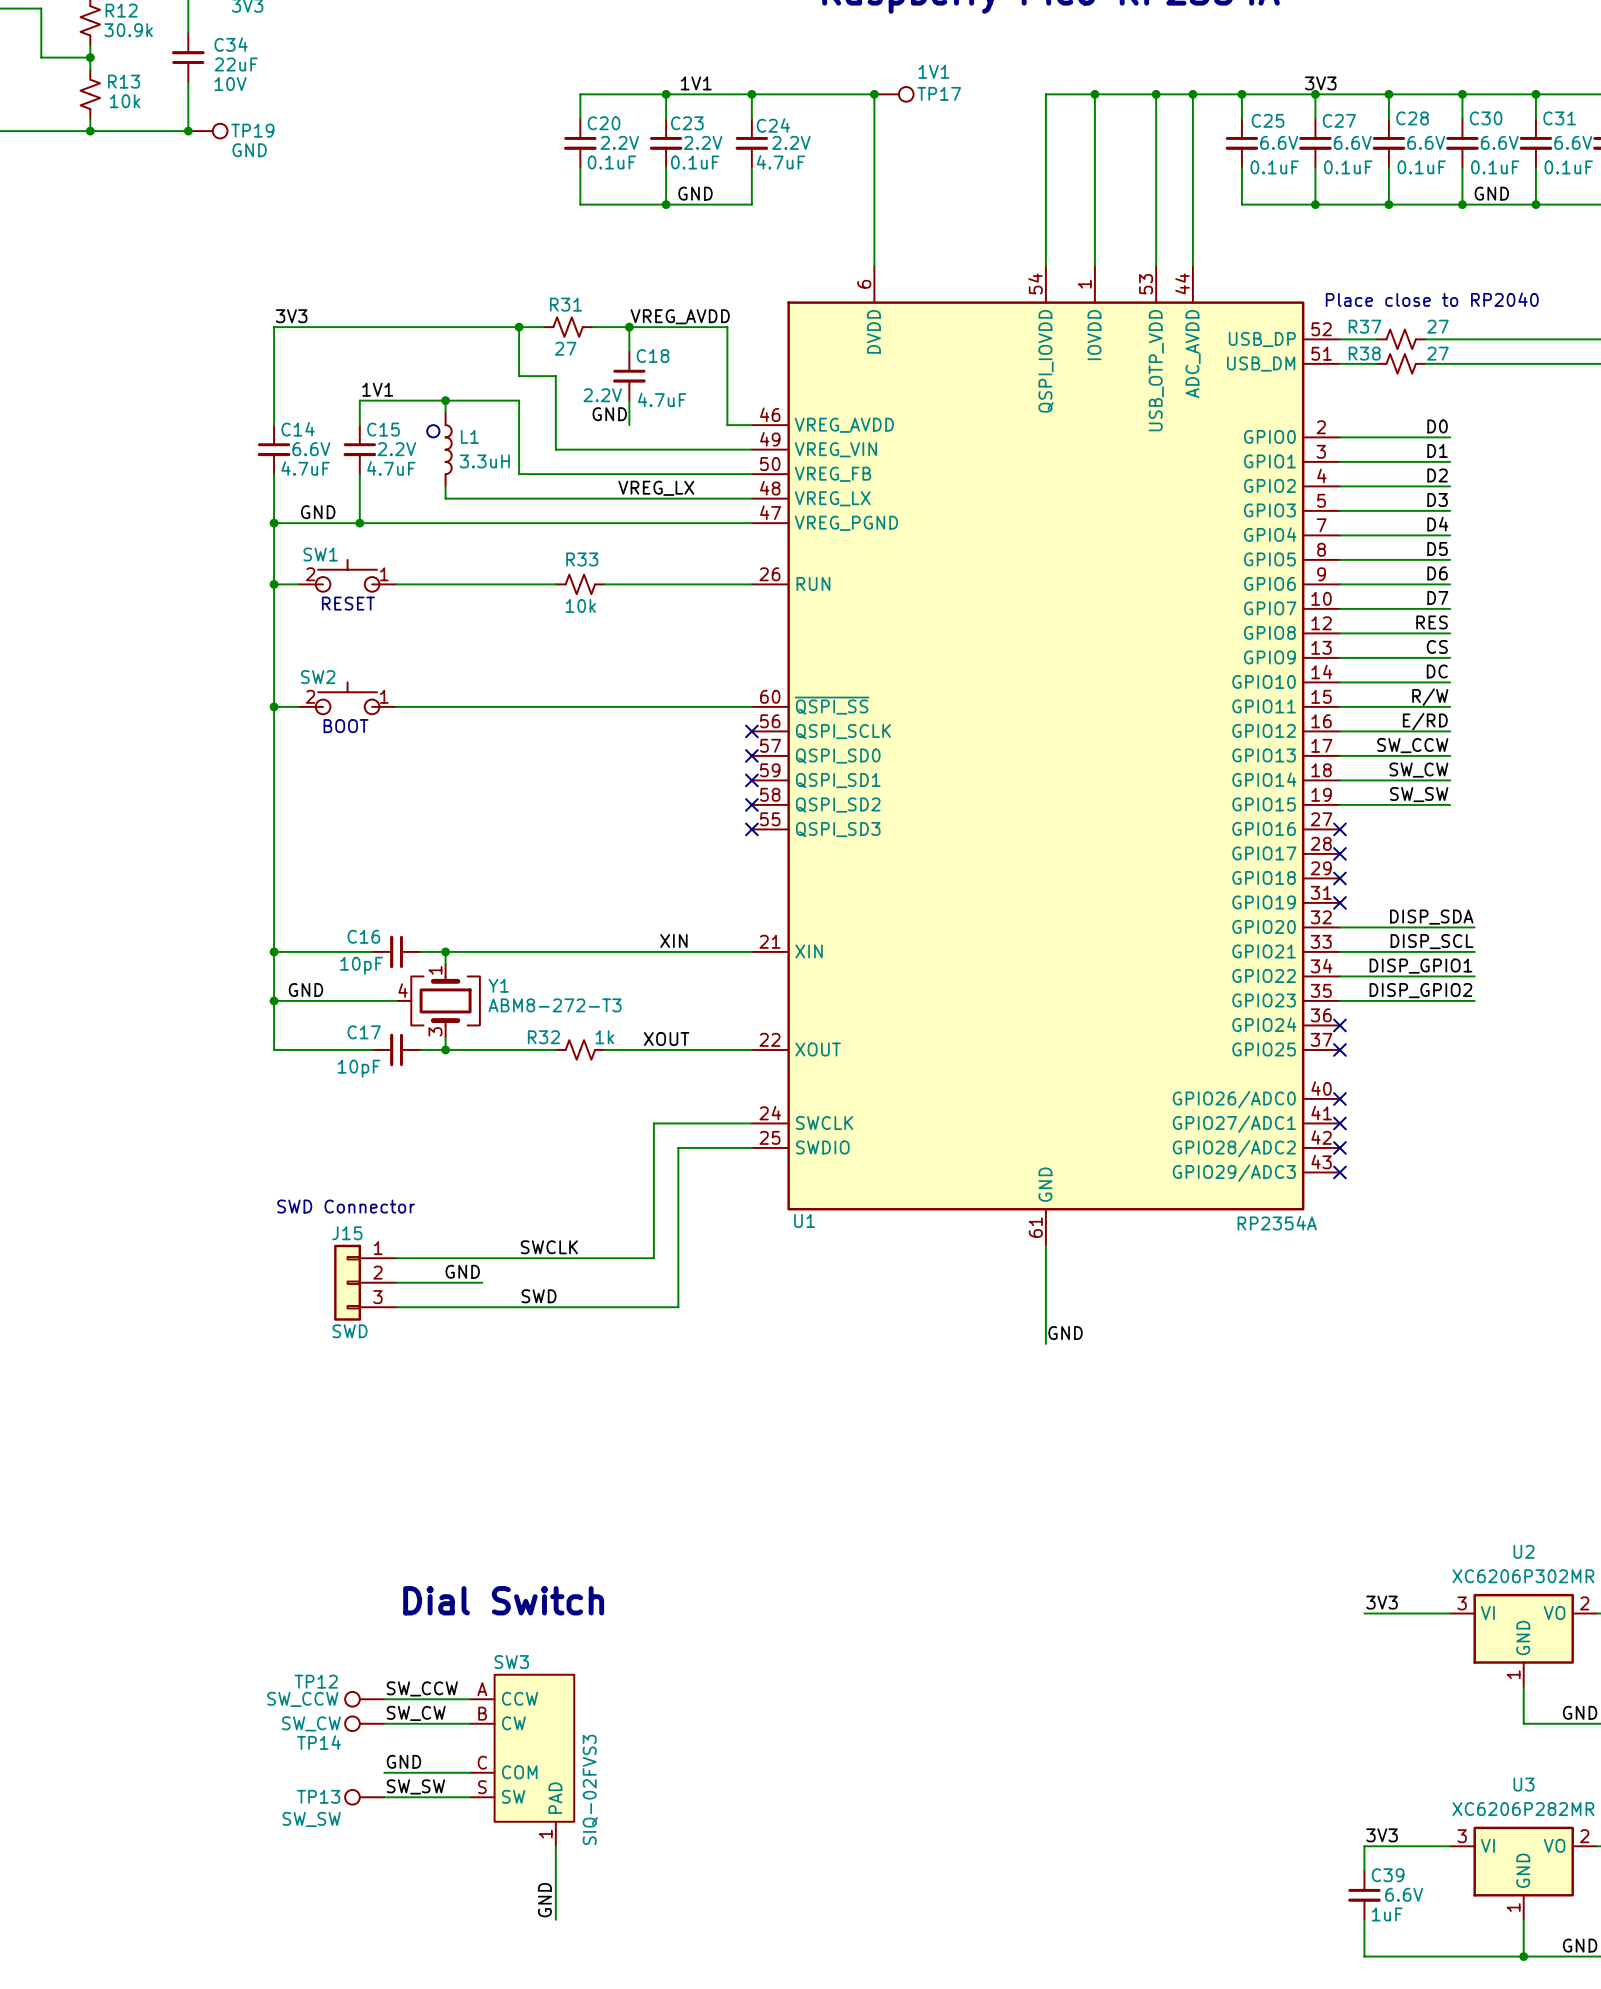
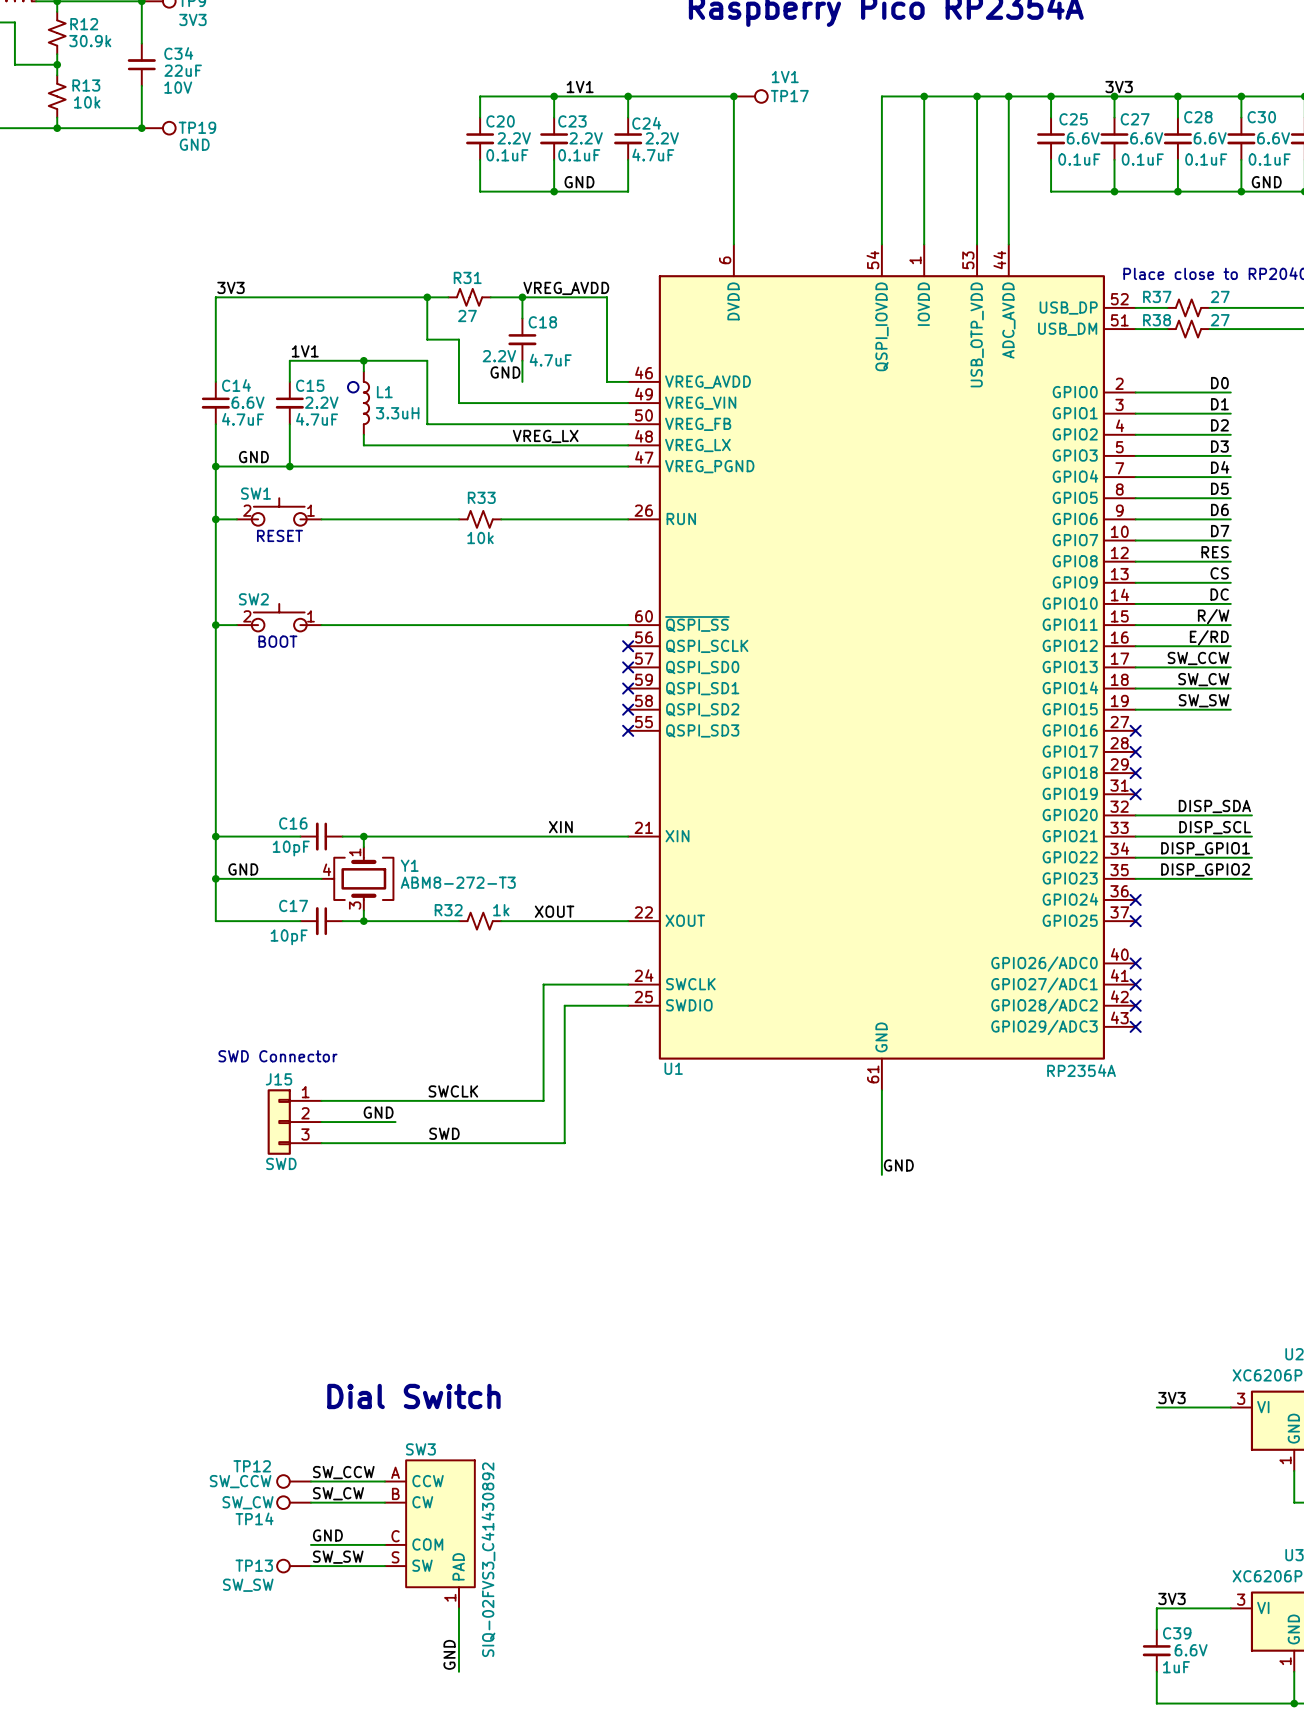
SW3 value: SIQ-02FVS3 (590, 1789) -> SIQ-02FVS3_C41430892 (488, 1559)

